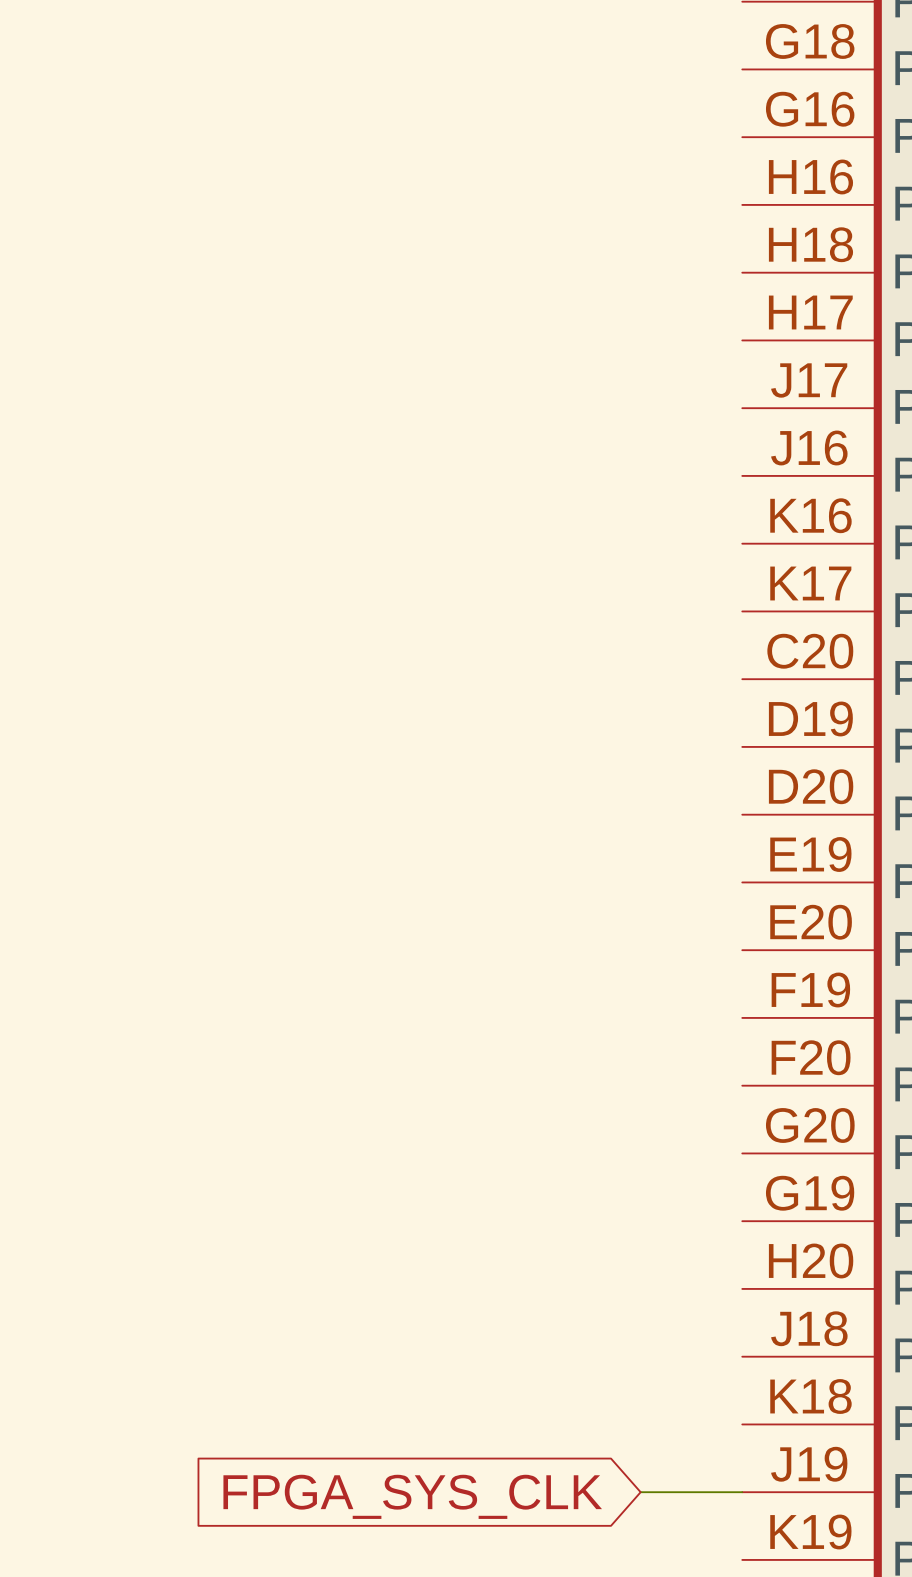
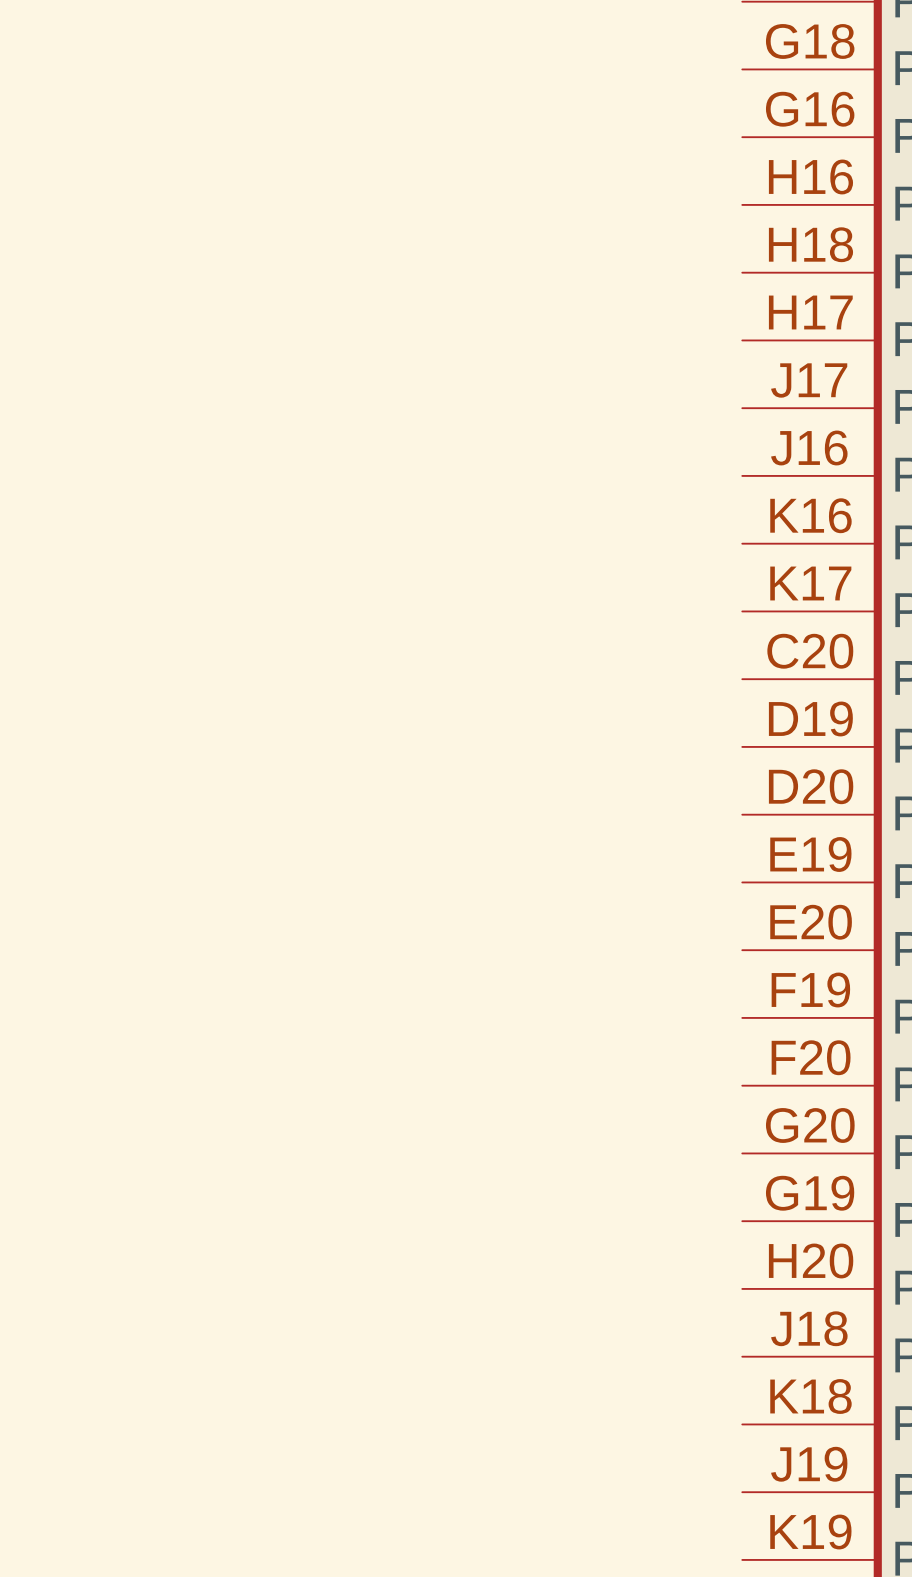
wire: (640, 1492) (742, 1492) -> none
global label: FPGA_SYS_CLK (412, 1496) -> none

